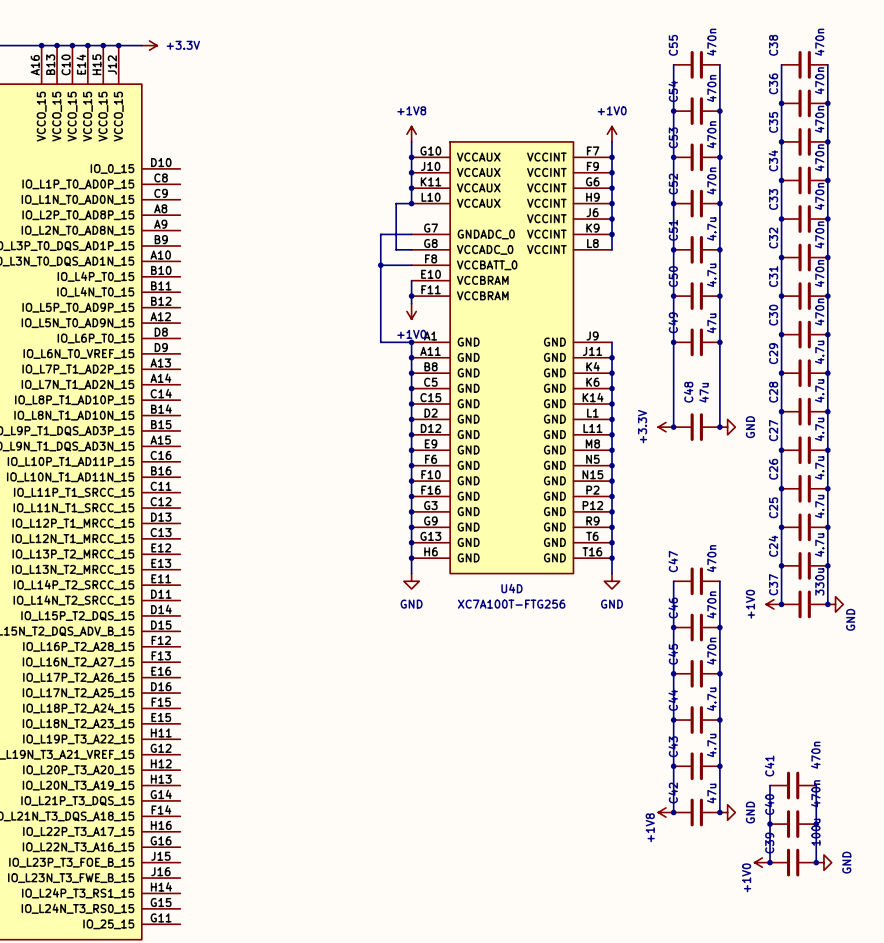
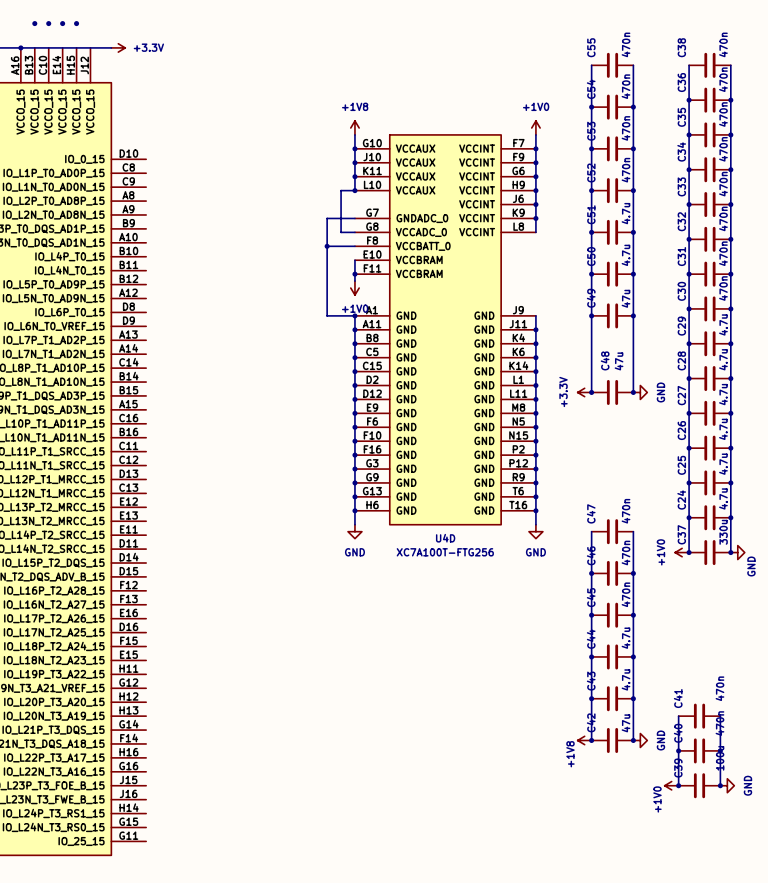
junction: none -> (34, 23)
junction: none -> (48, 23)
junction: none -> (62, 23)
junction: none -> (76, 23)
junction: (57, 45) -> none
junction: (72, 45) -> none
junction: (87, 45) -> none
junction: (103, 45) -> none
junction: (118, 45) -> none

